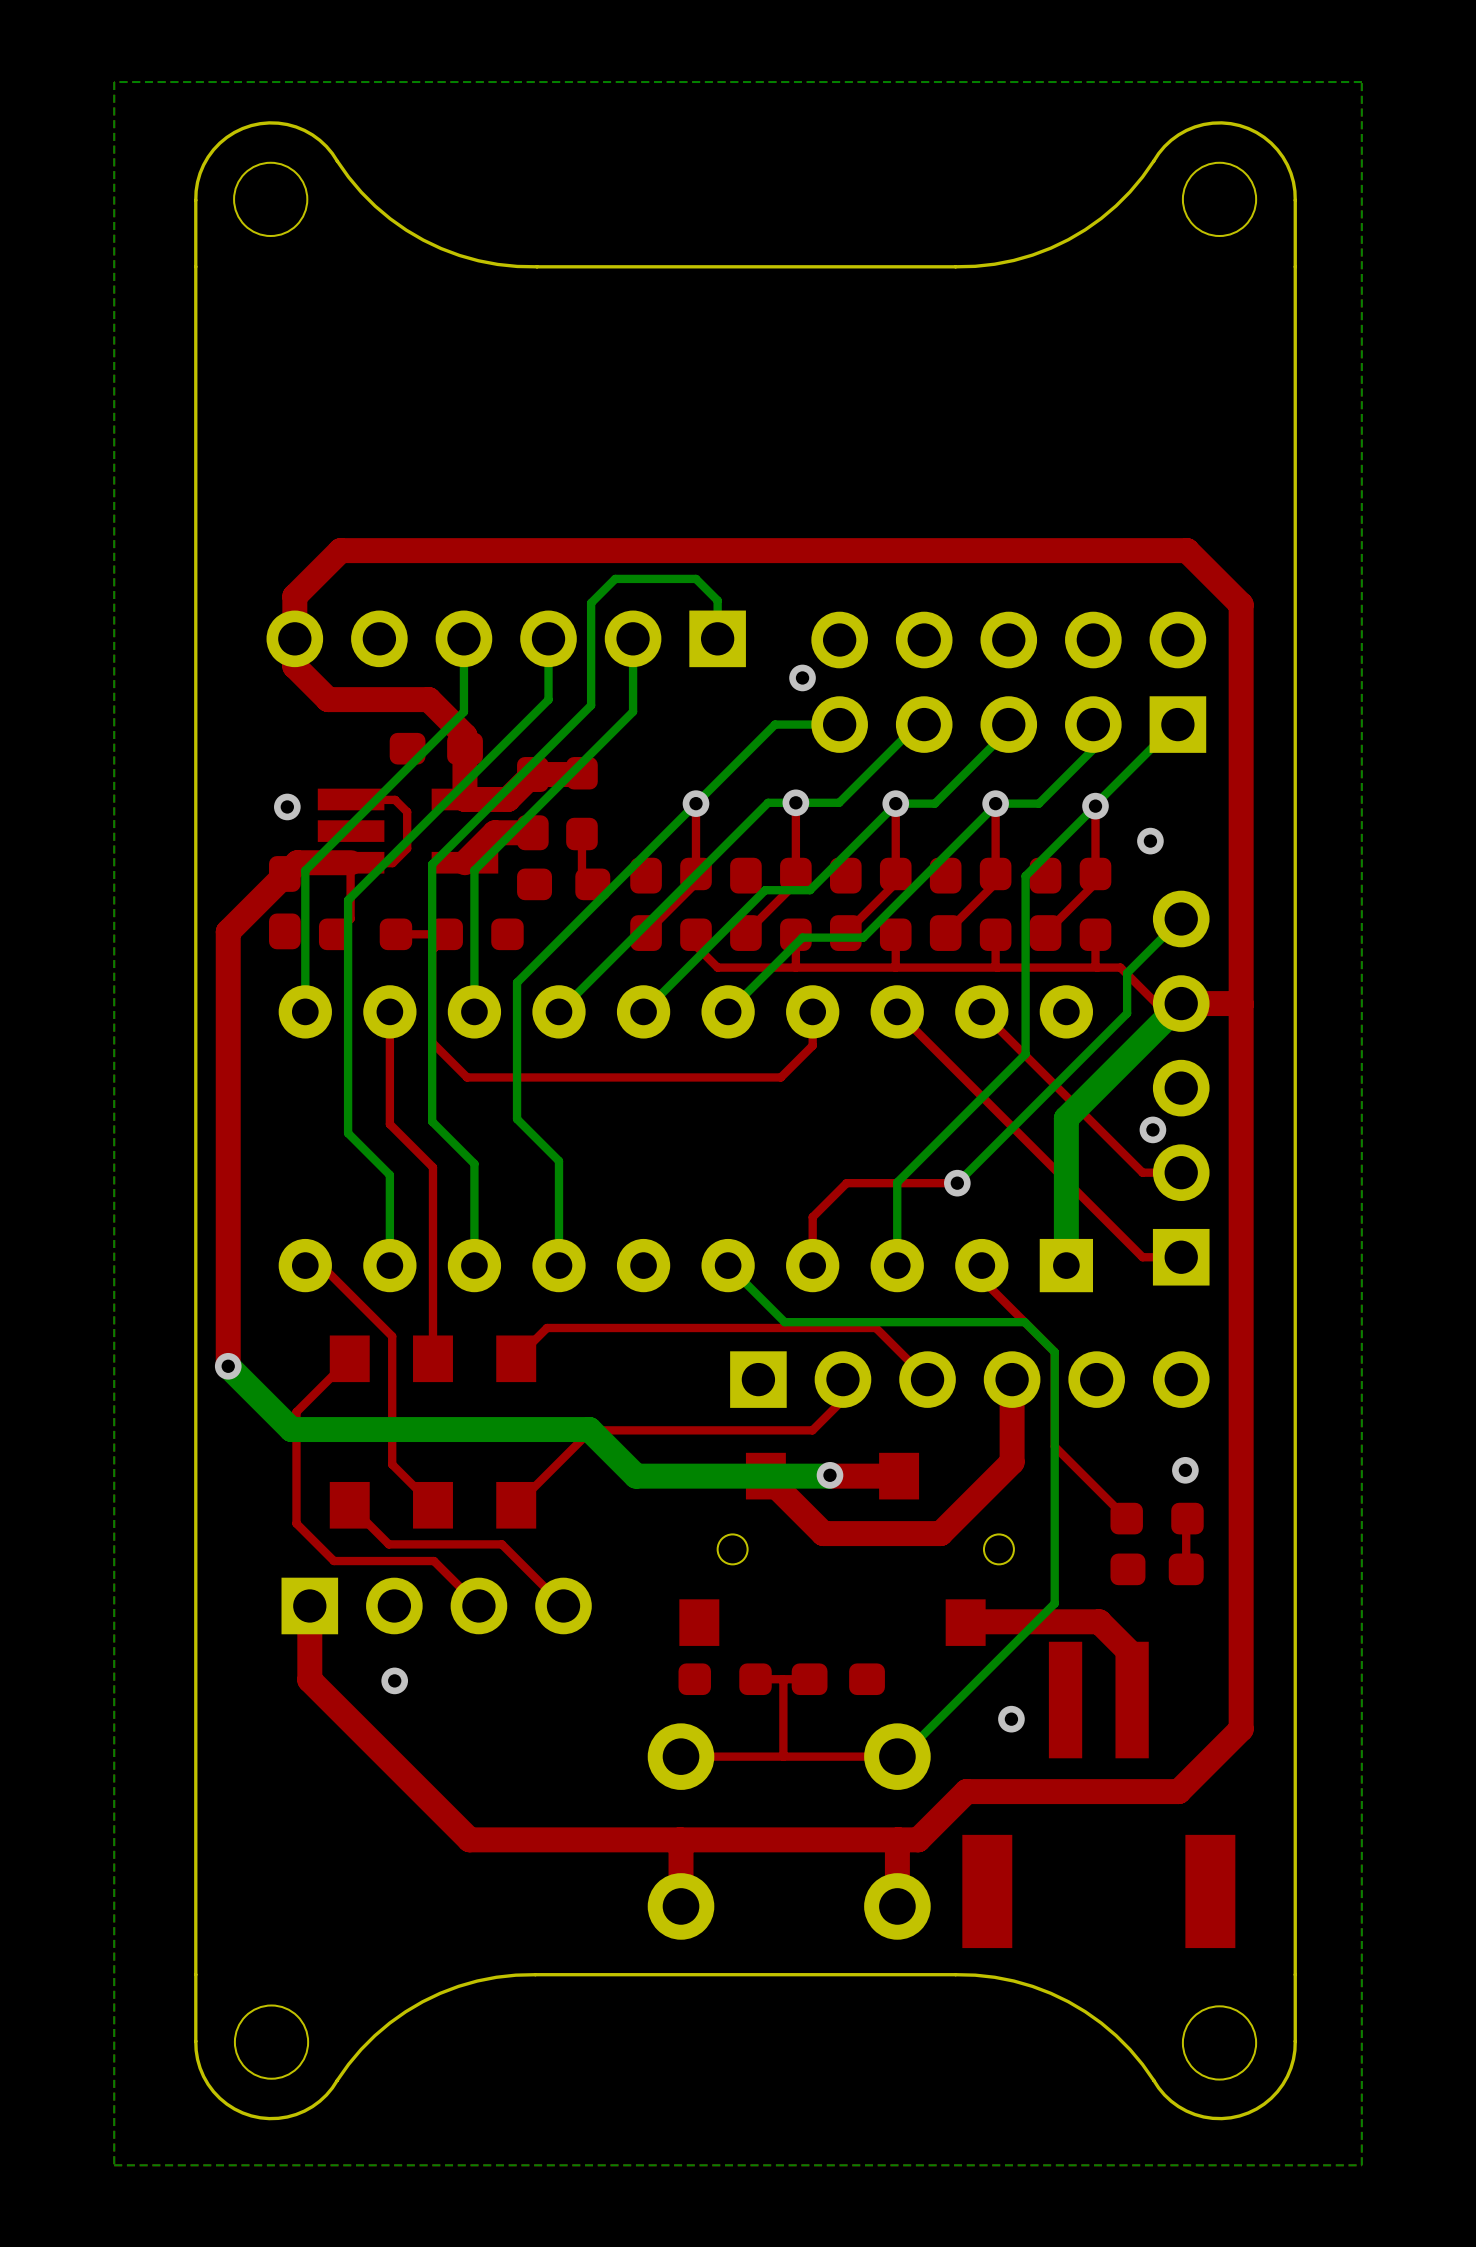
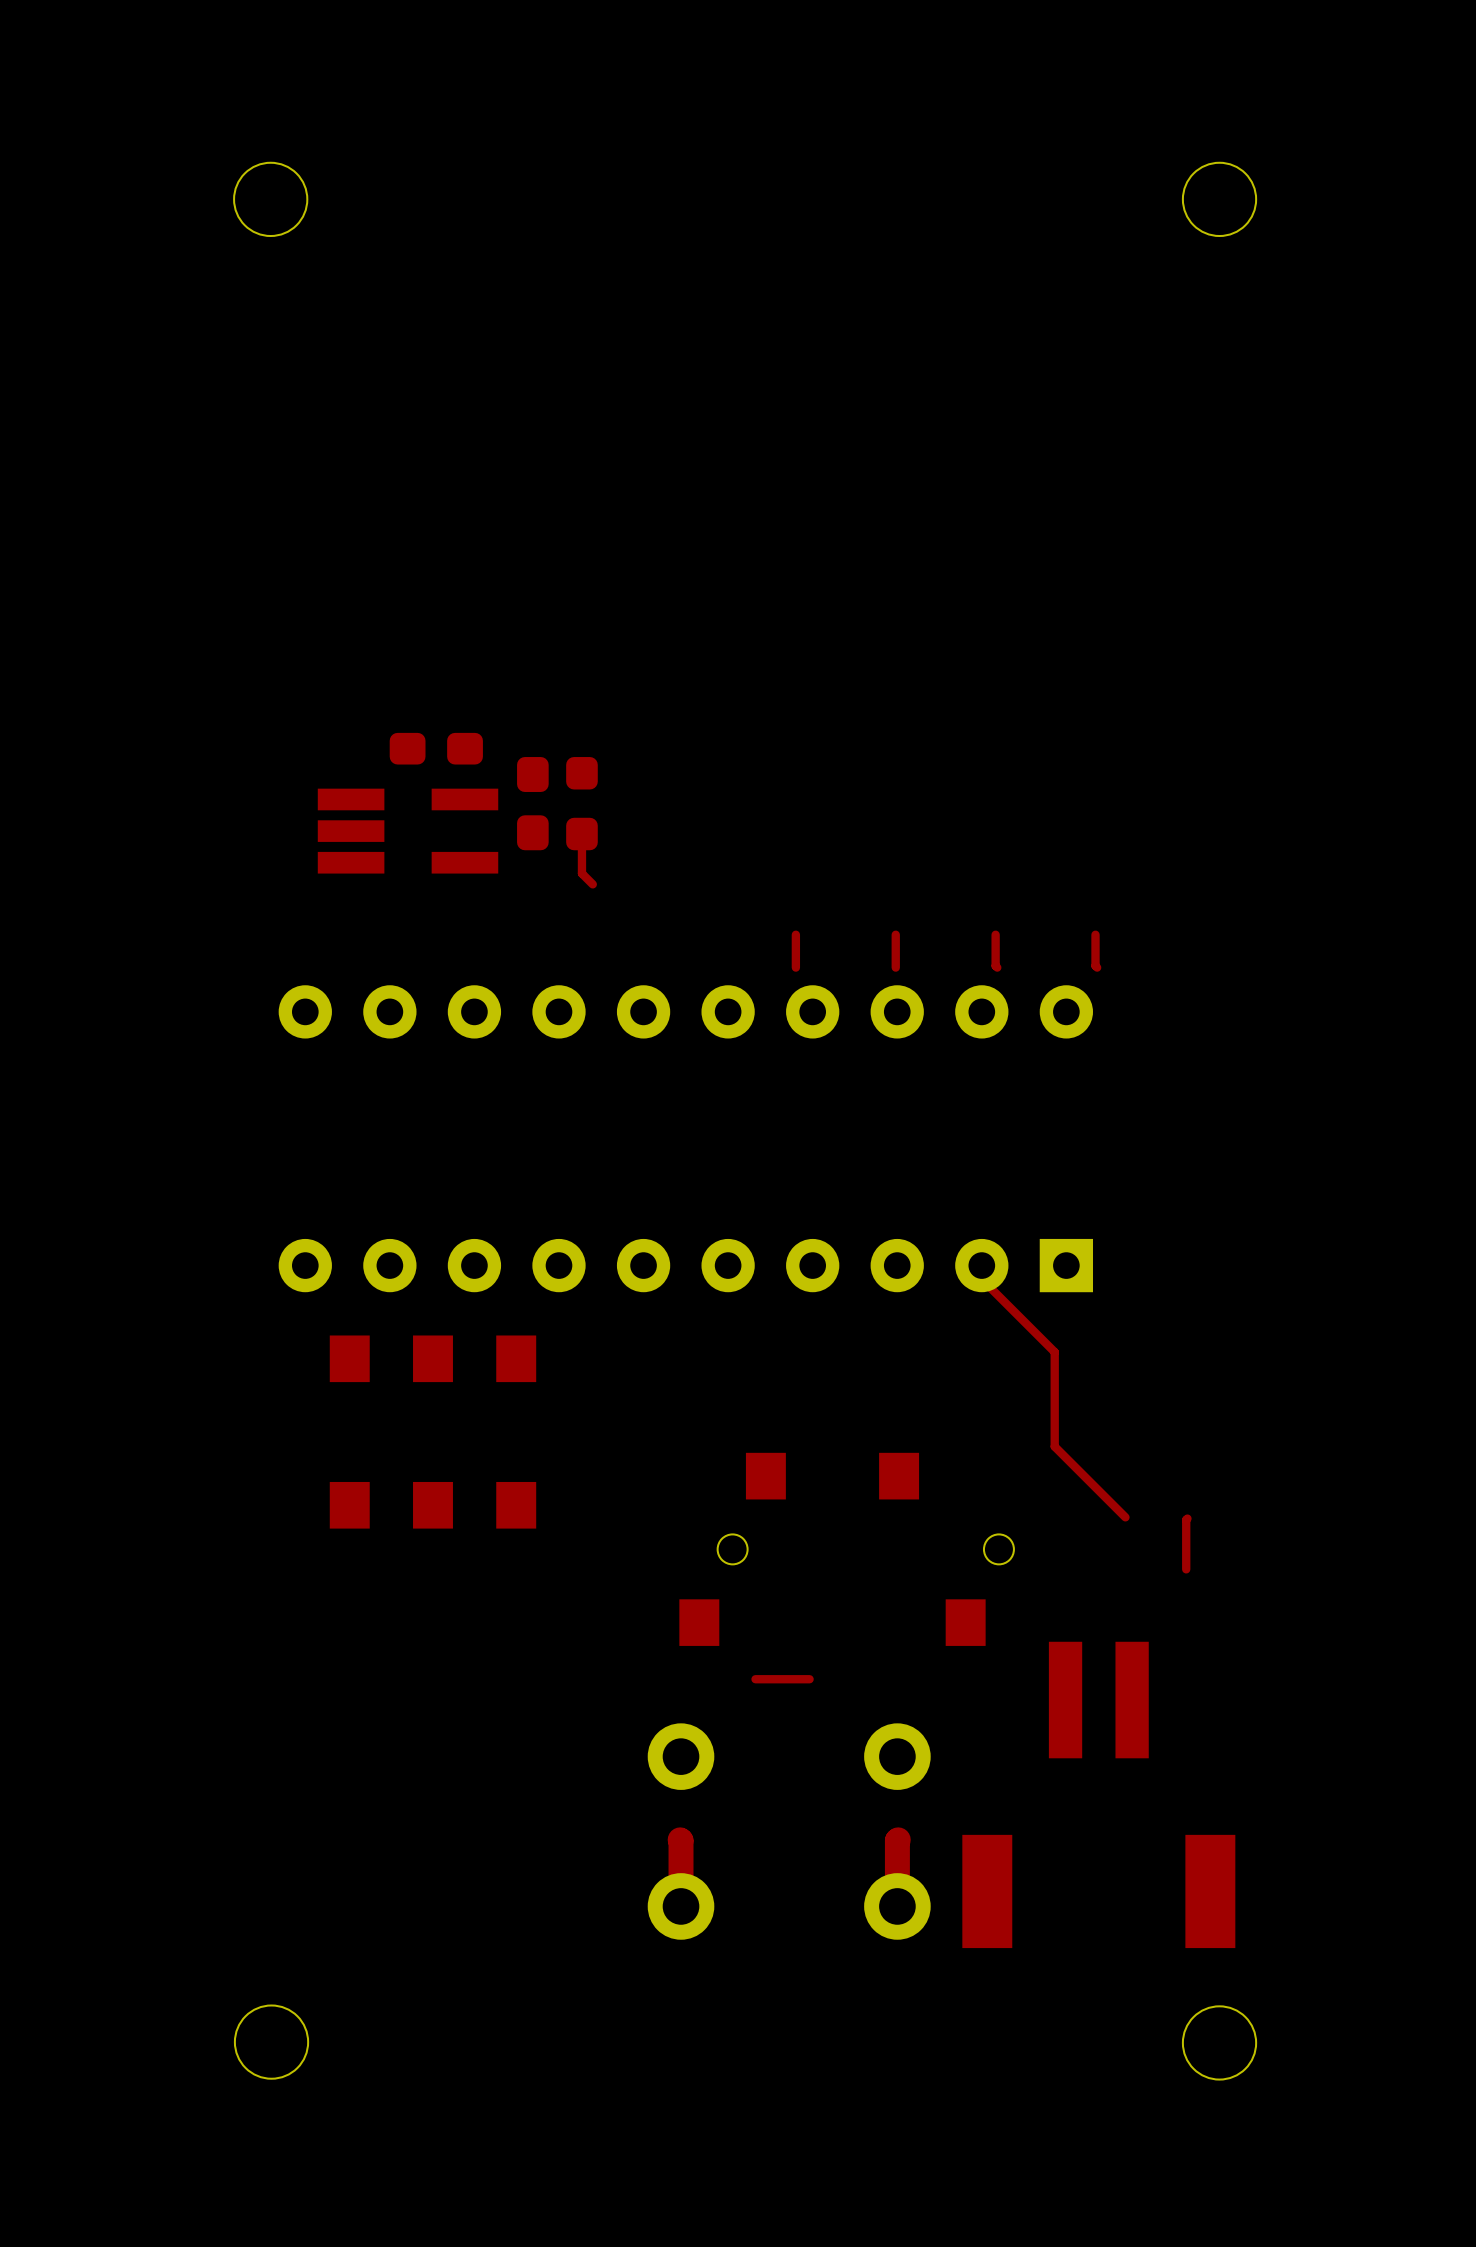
bottom zone outline: (1361, 82) (1361, 2165) (114, 2165) (114, 82) (1361, 82) -> none
board edge: (1153, 161) (1171, 140) (1194, 126) (1212, 123) (1239, 125) (1256, 132) (1277, 149) (1287, 165) (1294, 191) (1295, 2041) (1293, 2059) (1287, 2076) (1271, 2098) (1248, 2112) (1221, 2118) (1194, 2114) (1178, 2106) (1164, 2094) (1129, 2049) (1101, 2023) (1085, 2011) (1068, 2001) (1032, 1986) (994, 1977) (955, 1974) (515, 1975) (496, 1977) (458, 1986) (440, 1993) (405, 2011) (374, 2035) (348, 2064) (326, 2094) (304, 2111) (287, 2116) (269, 2118) (242, 2112) (219, 2098) (208, 2084) (200, 2068) (195, 2041) (195, 200) (197, 182) (203, 165) (219, 143) (242, 128) (269, 122) (296, 126) (319, 140) (332, 153) (361, 192) (375, 206) (406, 230) (441, 248) (478, 260) (497, 264) (537, 266) (955, 266) (994, 264) (1013, 260) (1050, 248) (1068, 239) (1085, 229) (1116, 205) (1142, 177) (1153, 161) -> none
bottom track: (463, 638) (463, 711) (305, 870) (305, 1011) -> none
part: (506, 638) -> none
bottom track: (548, 638) (548, 699) (348, 900) (348, 1133) (389, 1175) (389, 1265) -> none
bottom track: (633, 638) (633, 711) (474, 870) (474, 1011) -> none
bottom track: (717, 638) (717, 600) (695, 578) (615, 578) (591, 603) (591, 705) (432, 864) (432, 1121) (474, 1163) (474, 1265) -> none
via: (802, 677) -> none
part: (1008, 682) -> none
bottom track: (839, 724) (775, 724) (517, 982) (517, 1119) (559, 1161) (559, 1265) -> none
bottom track: (924, 724) (917, 724) (839, 802) (768, 802) (559, 1011) -> none
bottom track: (1008, 724) (1008, 729) (934, 803) (895, 803) (810, 890) (765, 890) (643, 1011) -> none
bottom track: (1093, 724) (1093, 749) (1038, 803) (995, 803) (863, 937) (802, 937) (728, 1011) -> none
bottom track: (1177, 724) (1175, 724) (1025, 876) (1025, 1054) (897, 1182) (897, 1265) -> none
top track: (581, 773) (532, 774) (507, 799) (464, 799) (465, 735) (428, 699) (328, 699) (294, 666) (294, 596) (340, 550) (1187, 550) (1241, 604) (1241, 1729) (1178, 1791) (966, 1791) (918, 1839) (469, 1839) (309, 1680) (309, 1605) -> none
top track: (351, 799) (395, 799) (407, 811) (407, 848) (392, 863) (351, 863) -> none
top track: (795, 802) (795, 883) (745, 933) -> none
via: (795, 802) -> none
top track: (695, 803) (695, 883) (646, 933) -> none
via: (695, 803) -> none
top track: (895, 803) (895, 883) (845, 933) -> none
via: (895, 803) -> none
top track: (995, 803) (995, 883) (945, 933) -> none
via: (995, 803) -> none
via: (287, 806) -> none
top track: (1095, 806) (1095, 883) (1045, 933) -> none
via: (1095, 806) -> none
top track: (532, 832) (494, 832) (464, 862) -> none
via: (1150, 841) -> none
part: (563, 884) -> none
part: (284, 902) -> none
part: (646, 904) -> none
part: (695, 904) -> none
part: (745, 904) -> none
part: (795, 904) -> none
part: (845, 904) -> none
part: (895, 904) -> none
part: (945, 904) -> none
part: (995, 904) -> none
part: (1045, 904) -> none
part: (1095, 904) -> none
bottom track: (1181, 919) (1127, 973) (1127, 1013) (957, 1183) -> none
top track: (335, 934) (350, 918) (351, 862) (297, 862) (228, 931) (228, 1366) -> none
part: (365, 934) -> none
top track: (395, 934) (446, 934) (432, 950) (432, 1042) (467, 1077) (780, 1077) (812, 1045) (812, 1011) -> none
part: (477, 934) -> none
top track: (695, 934) (695, 945) (717, 967) (1120, 967) (1156, 1003) (1241, 1004) -> none
bottom track: (1181, 1003) (1066, 1118) (1066, 1265) -> none
top track: (389, 1011) (389, 1124) (432, 1167) (432, 1358) -> none
top track: (897, 1011) (1142, 1257) (1181, 1257) -> none
top track: (981, 1011) (1142, 1172) (1181, 1172) -> none
part: (1181, 1088) -> none
via: (1152, 1129) -> none
top track: (957, 1183) (846, 1183) (812, 1217) (812, 1265) -> none
via: (957, 1183) -> none
top track: (305, 1265) (321, 1265) (392, 1336) (392, 1464) (432, 1505) -> none
bottom track: (728, 1265) (784, 1322) (1024, 1322) (1054, 1352) (1054, 1603) (901, 1756) (897, 1756) -> none
top track: (349, 1358) (296, 1412) (296, 1523) (333, 1561) (433, 1561) (478, 1605) -> none
top track: (516, 1358) (547, 1327) (875, 1327) (927, 1379) -> none
bottom track: (228, 1366) (291, 1429) (589, 1429) (636, 1476) (829, 1475) -> none
via: (228, 1366) -> none
top track: (842, 1379) (842, 1399) (812, 1430) (591, 1430) (516, 1505) -> none
part: (969, 1379) -> none
top track: (1012, 1379) (1012, 1462) (940, 1533) (823, 1533) (765, 1476) -> none
via: (1185, 1470) -> none
top track: (829, 1475) (899, 1476) -> none
via: (829, 1475) -> none
top track: (349, 1505) (388, 1544) (501, 1544) (563, 1605) -> none
part: (1157, 1518) -> none
part: (1157, 1569) -> none
part: (436, 1605) -> none
top track: (968, 1621) (1099, 1621) (1132, 1654) (1132, 1700) -> none
part: (725, 1679) -> none
top track: (782, 1679) (783, 1756) -> none
part: (838, 1679) -> none
via: (394, 1680) -> none
via: (1011, 1719) -> none
top track: (897, 1756) (681, 1756) -> none

